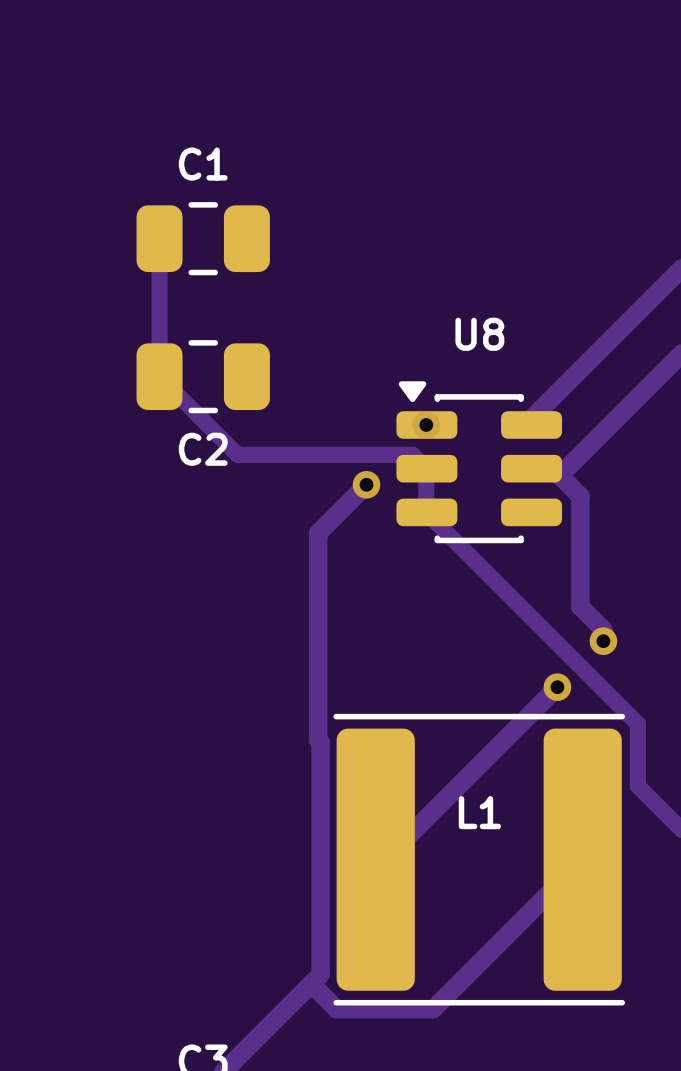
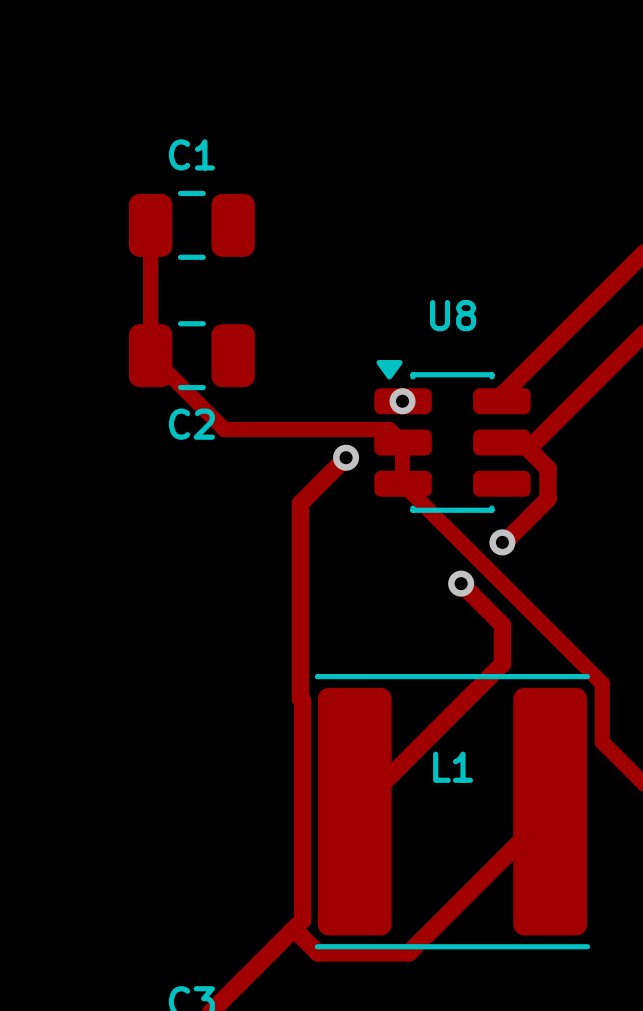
track: (580, 528) (580, 606) (603, 629) (603, 641) -> (548, 498) (504, 542)
via: none -> (502, 542)
via: none -> (461, 583)
via: (603, 641) -> none
track: (557, 687) (384, 859) (375, 859) -> (461, 583) (502, 624) (502, 664) (354, 811)
via: (557, 687) -> none

